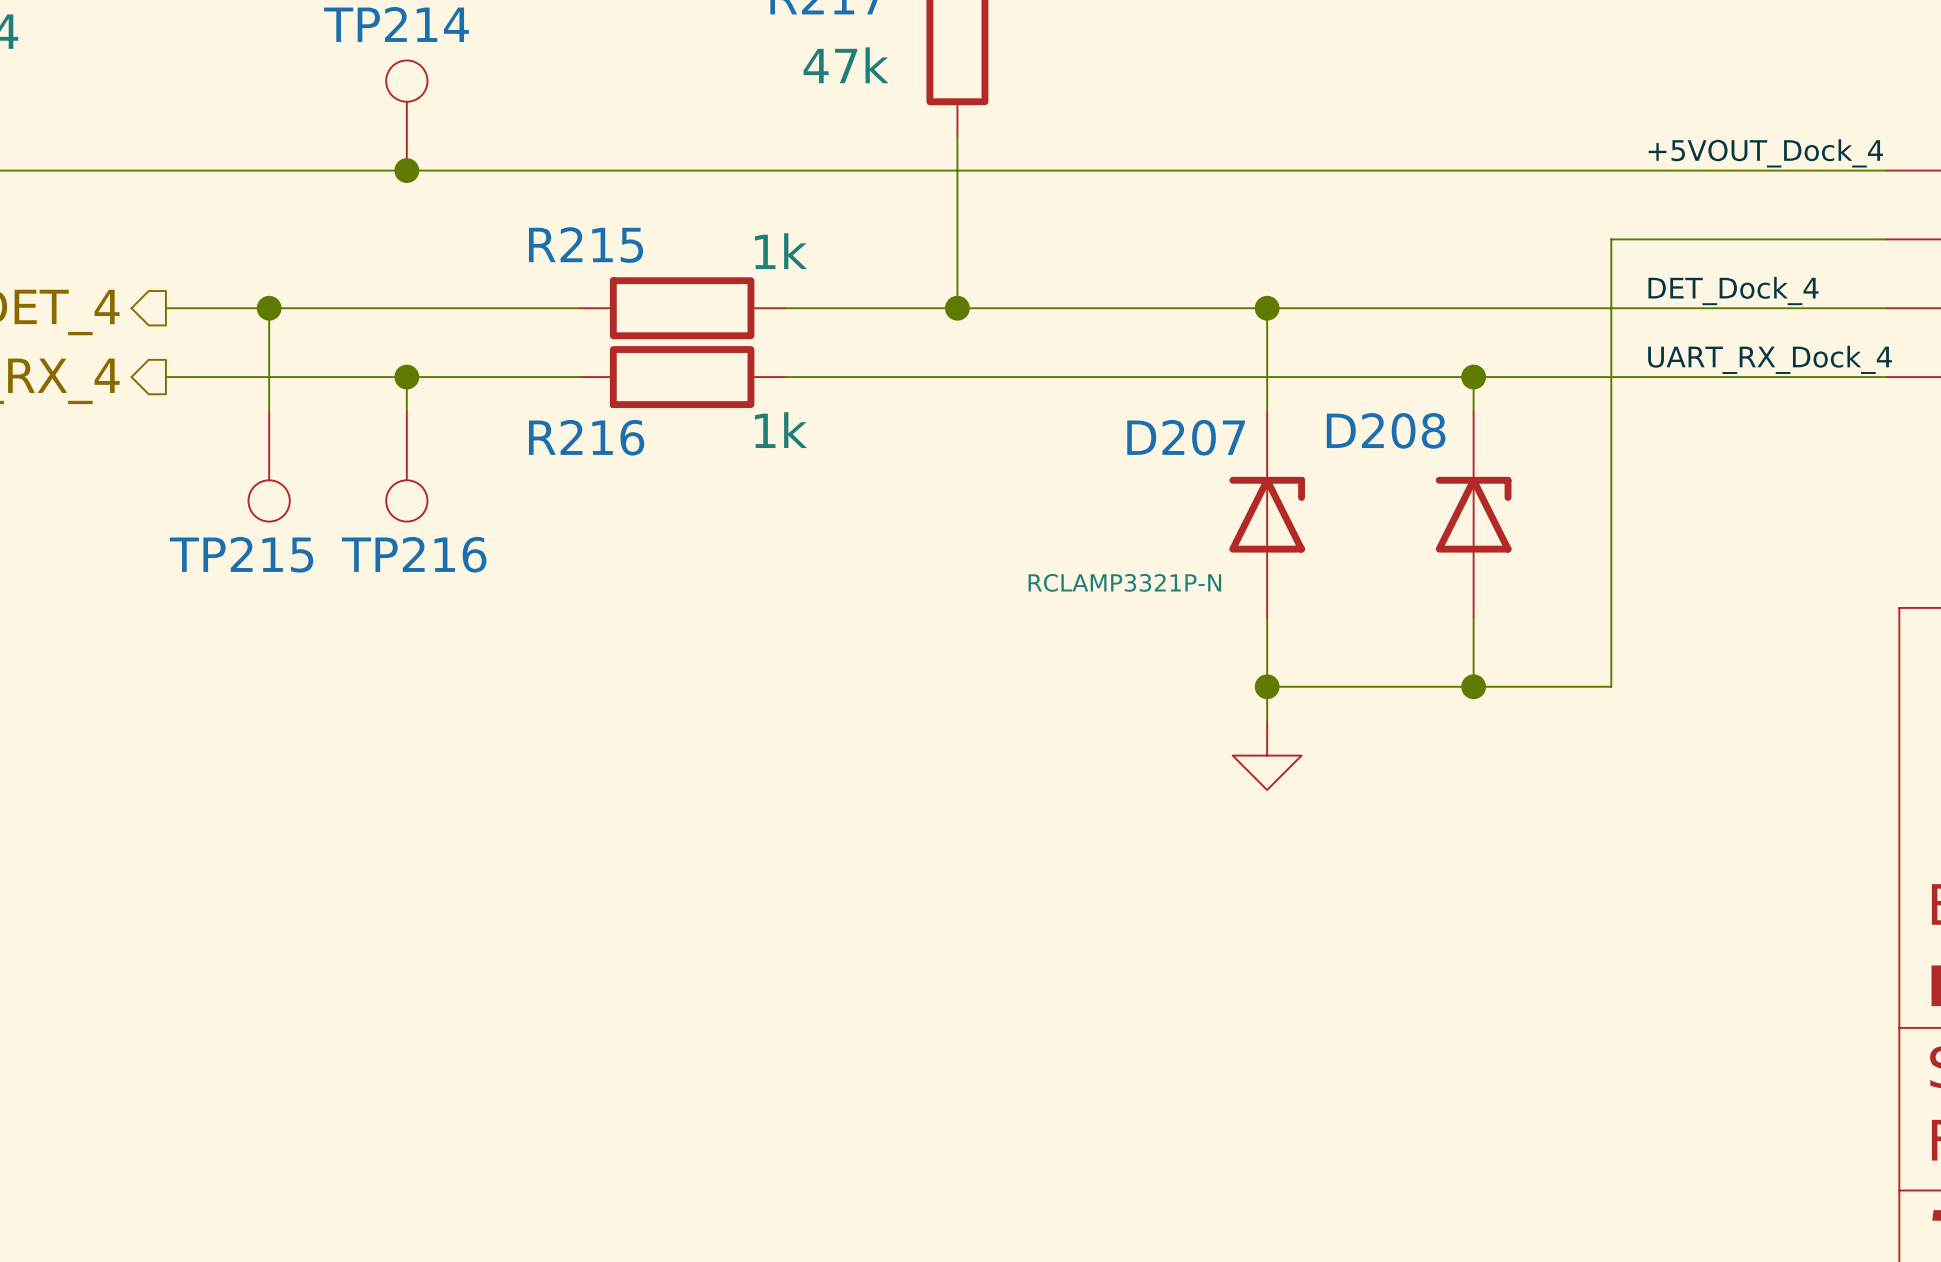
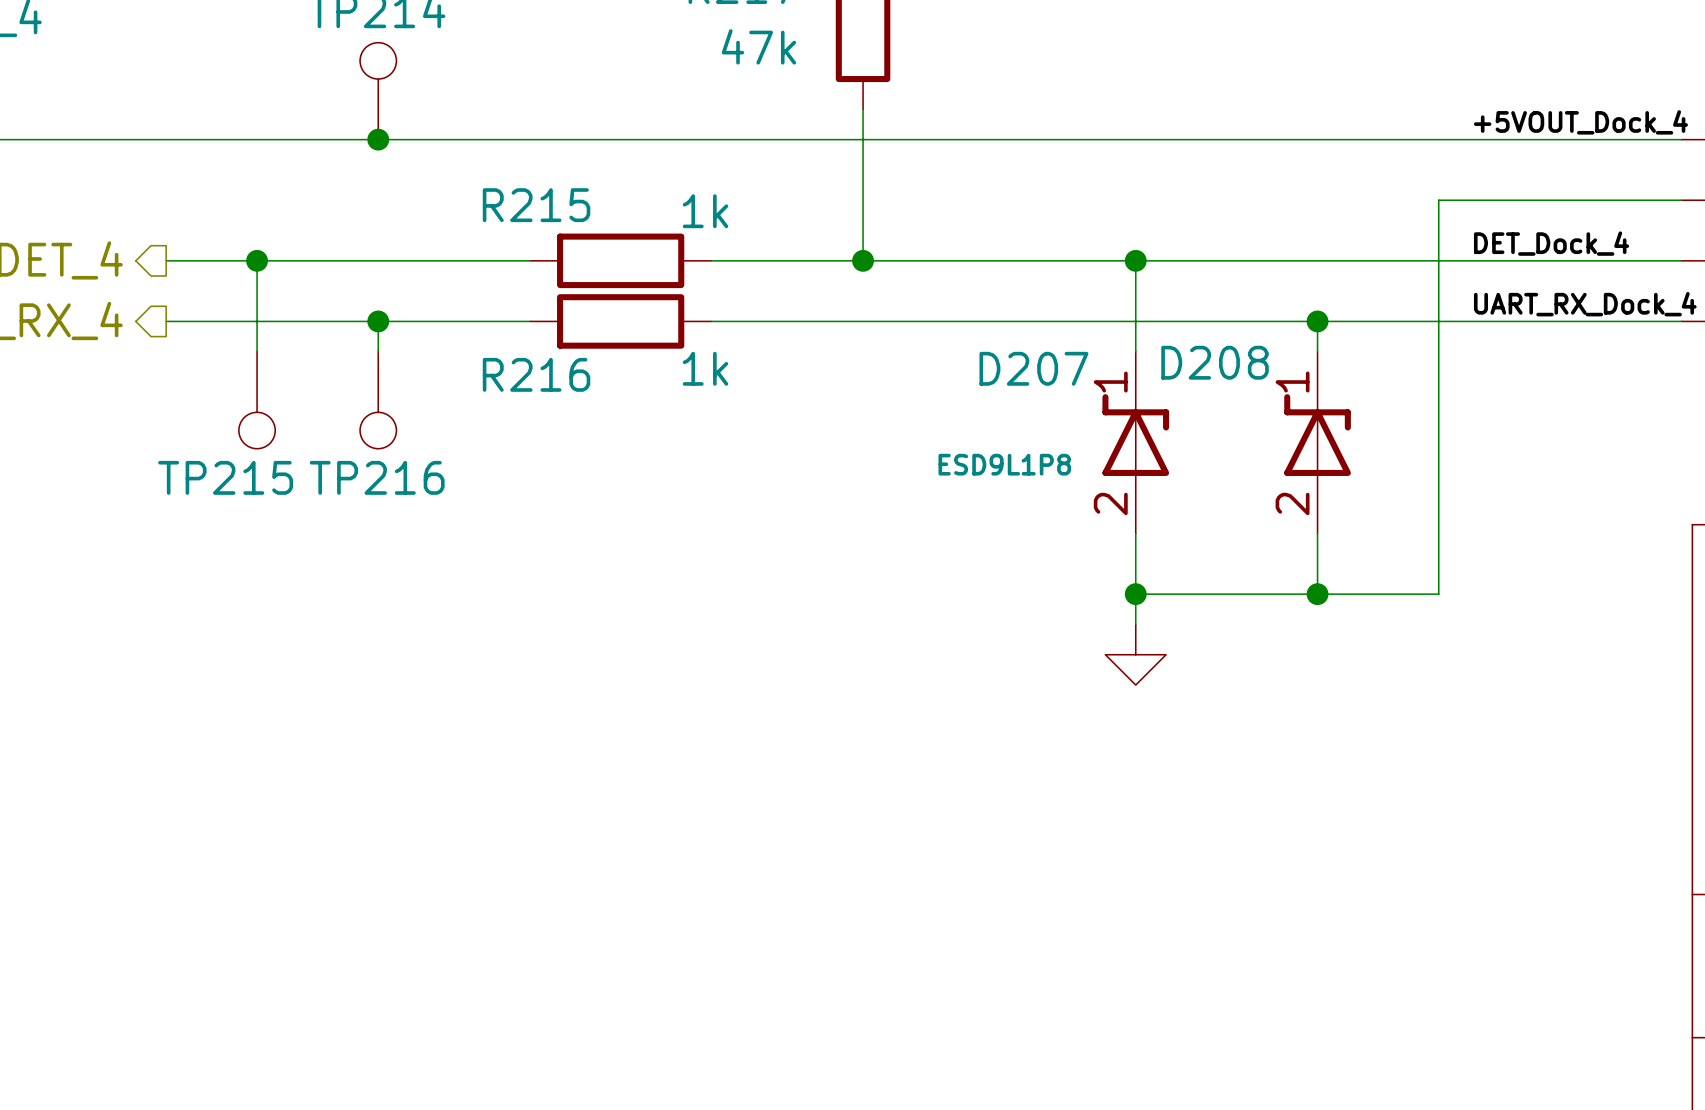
D207 symbol: [1229, 411, 1306, 618] -> [1102, 351, 1170, 534]
D208 symbol: [1435, 411, 1512, 618] -> [1284, 351, 1351, 534]
D207 name position: D207 (1186, 437) -> D207 (1033, 368)
D207 value: none -> ESD9L1P8 (1004, 464)
D208 value: RCLAMP3321P-N (1124, 582) -> none

